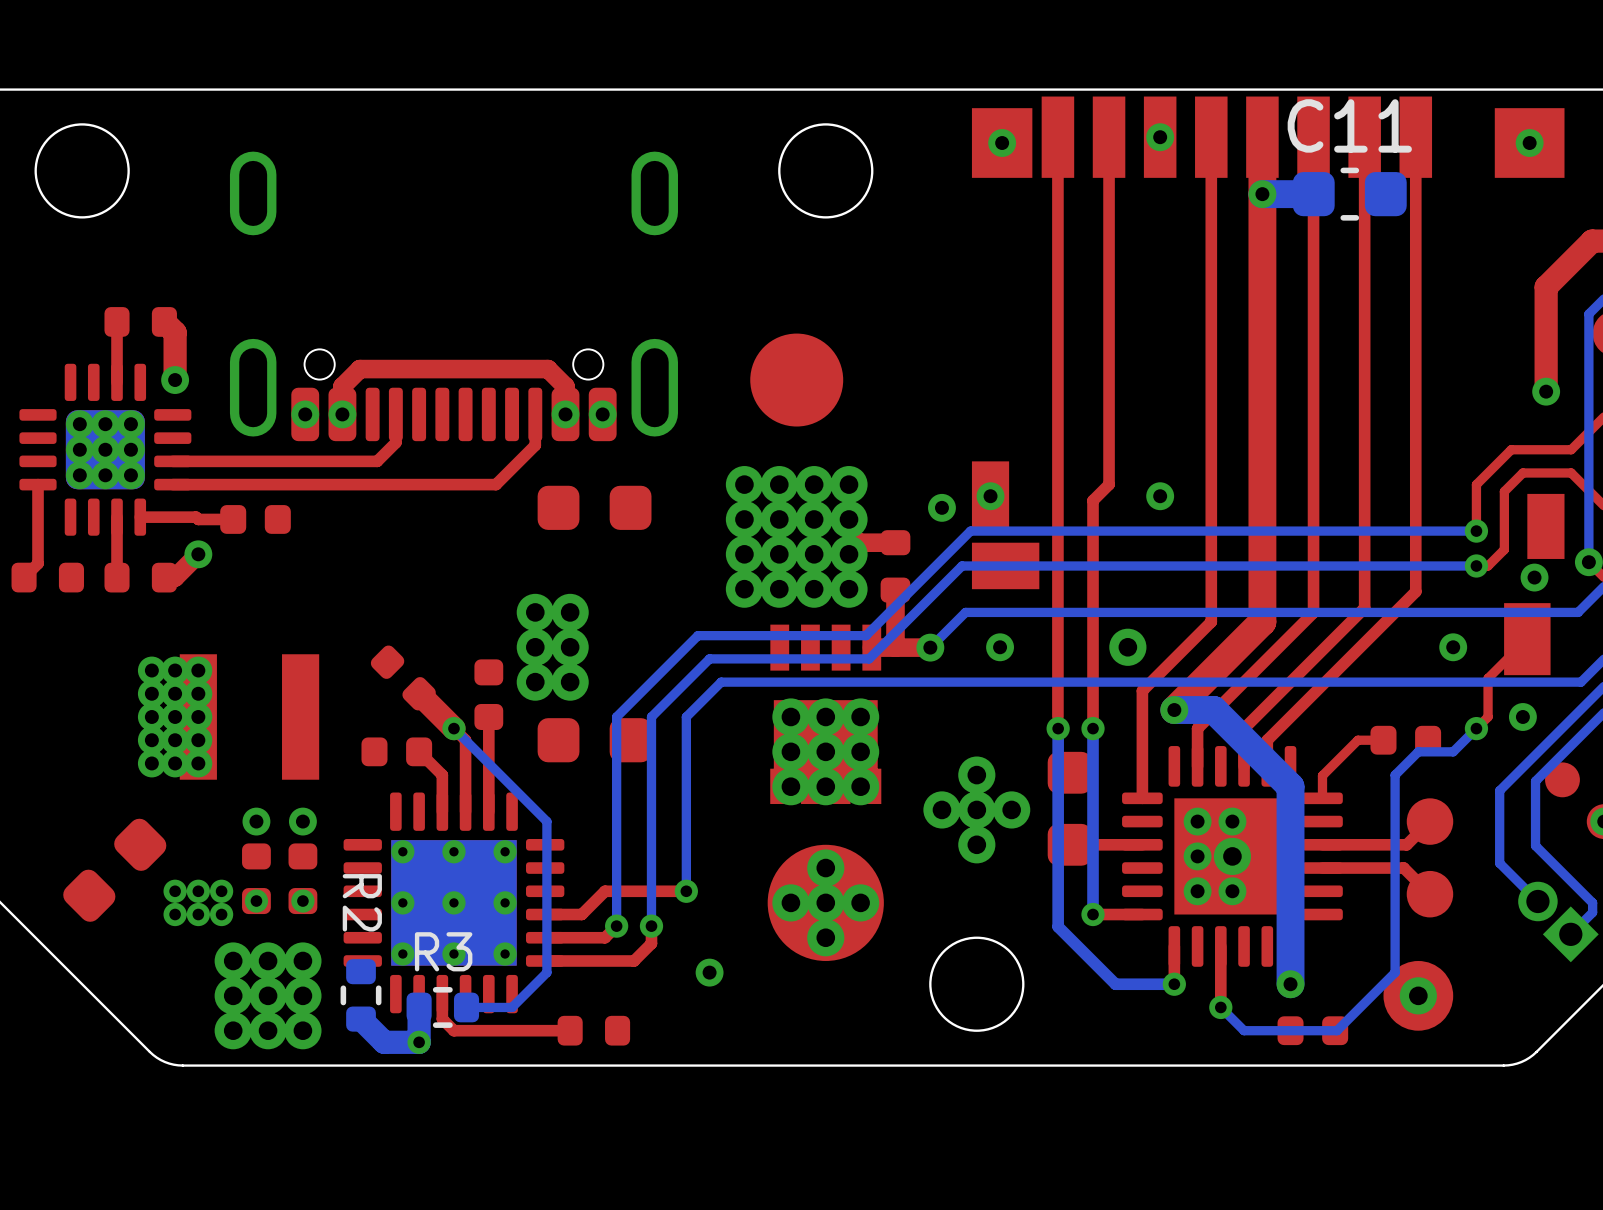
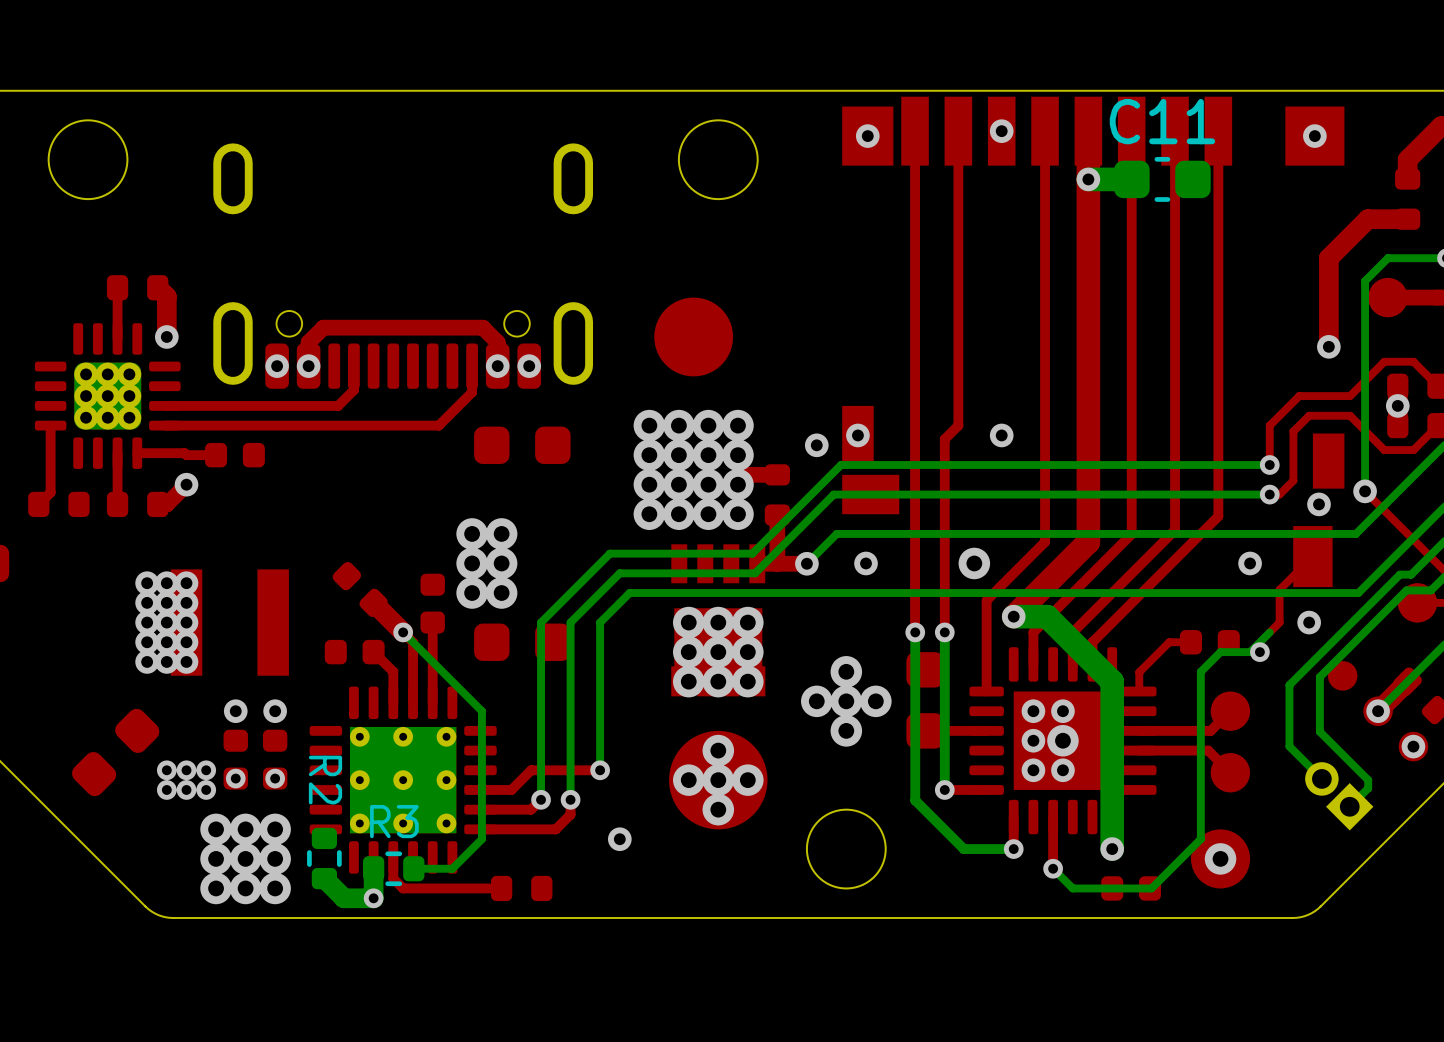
via position: (1476, 728) -> (1259, 652)

